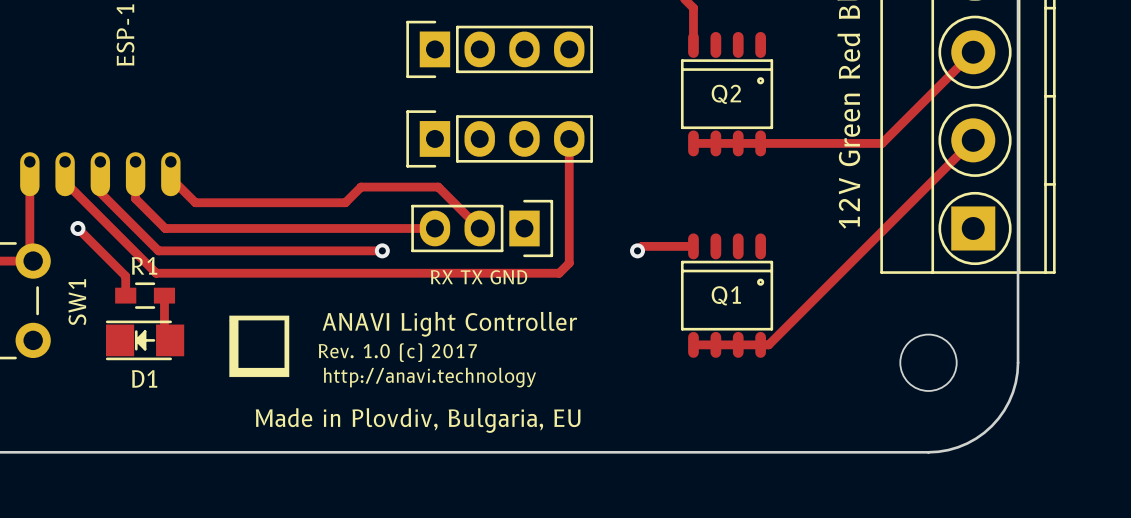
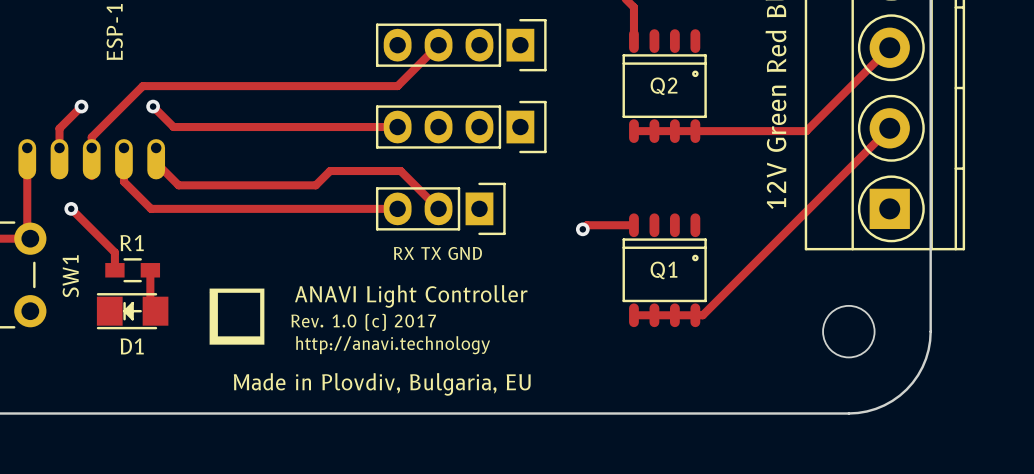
track: none -> (438, 45) (397, 86) (142, 86) (91, 137) (91, 147)
part rotation: 0° (499, 49) -> 180° (461, 45)
track: none -> (81, 106) (59, 128) (59, 147)
via: none -> (81, 106)
track: none -> (153, 106) (173, 127) (397, 127)
via: none -> (153, 106)
part rotation: 0° (499, 138) -> 180° (461, 127)
track: (569, 138) (569, 263) (559, 273) (156, 273) (65, 182) -> none
track: (100, 192) (158, 250) (382, 250) -> none
via: (382, 250) -> none

